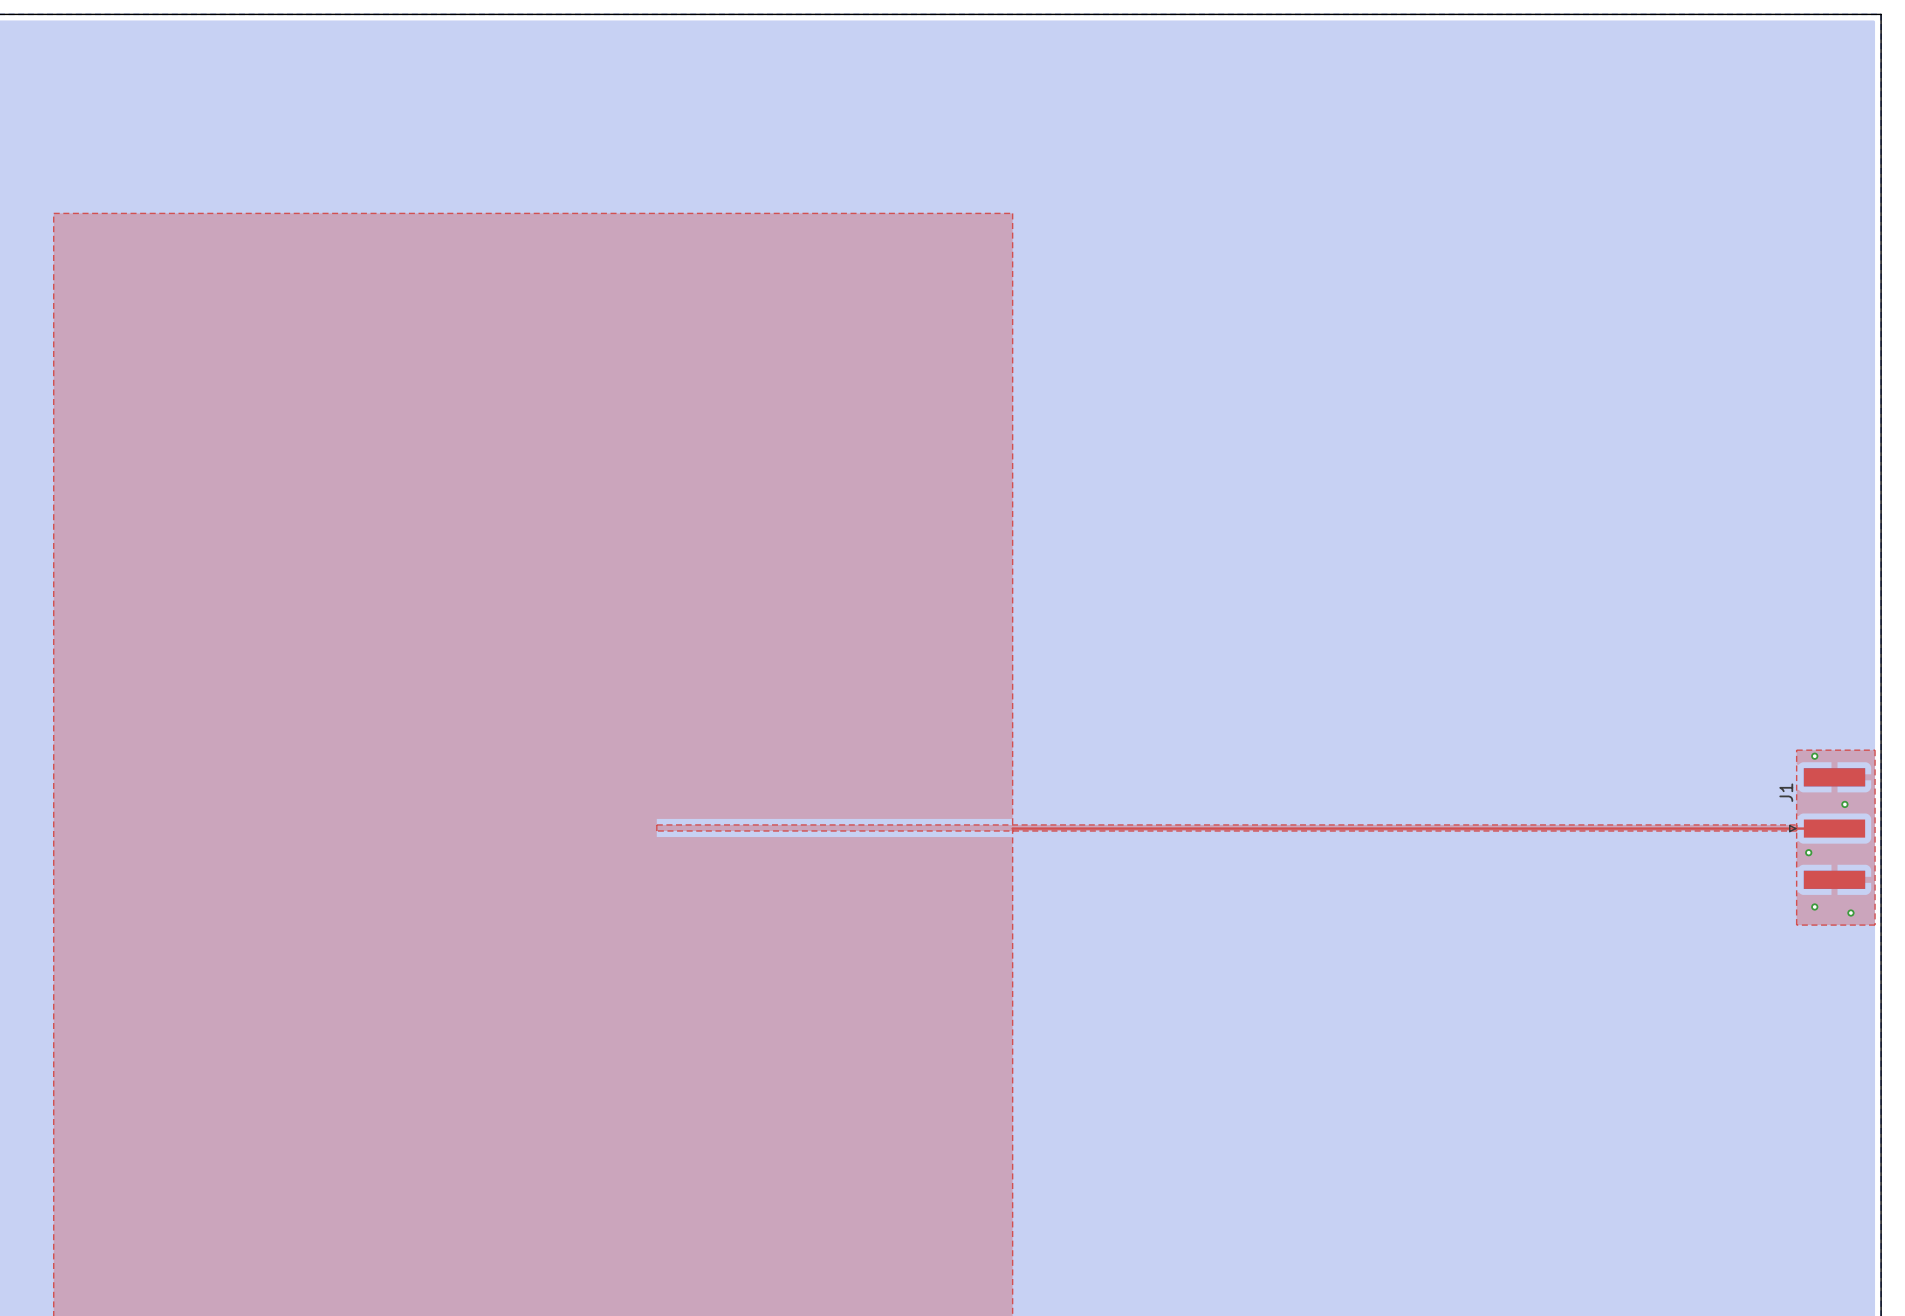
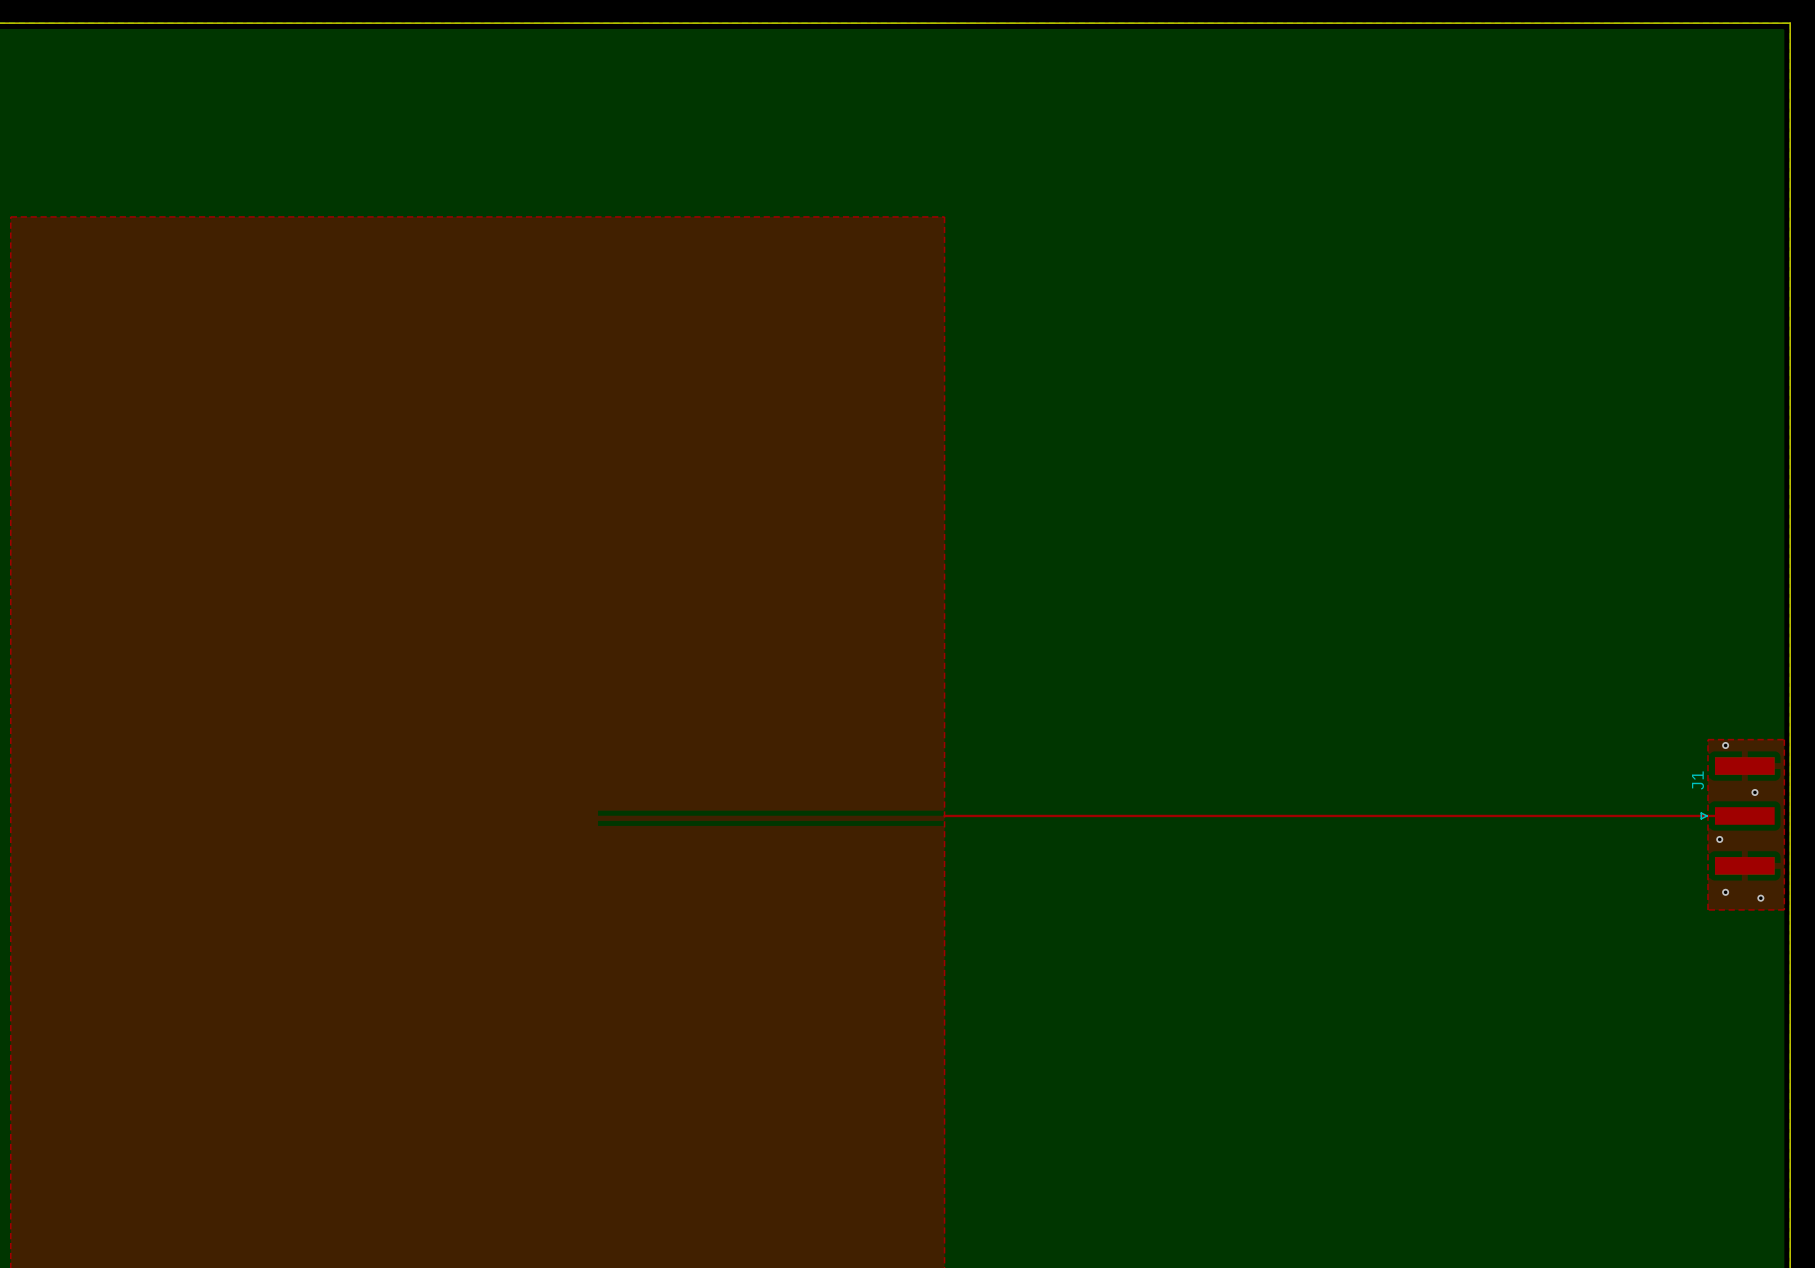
top zone outline: (1796, 824) (656, 824) (656, 830) (1796, 830) -> none

